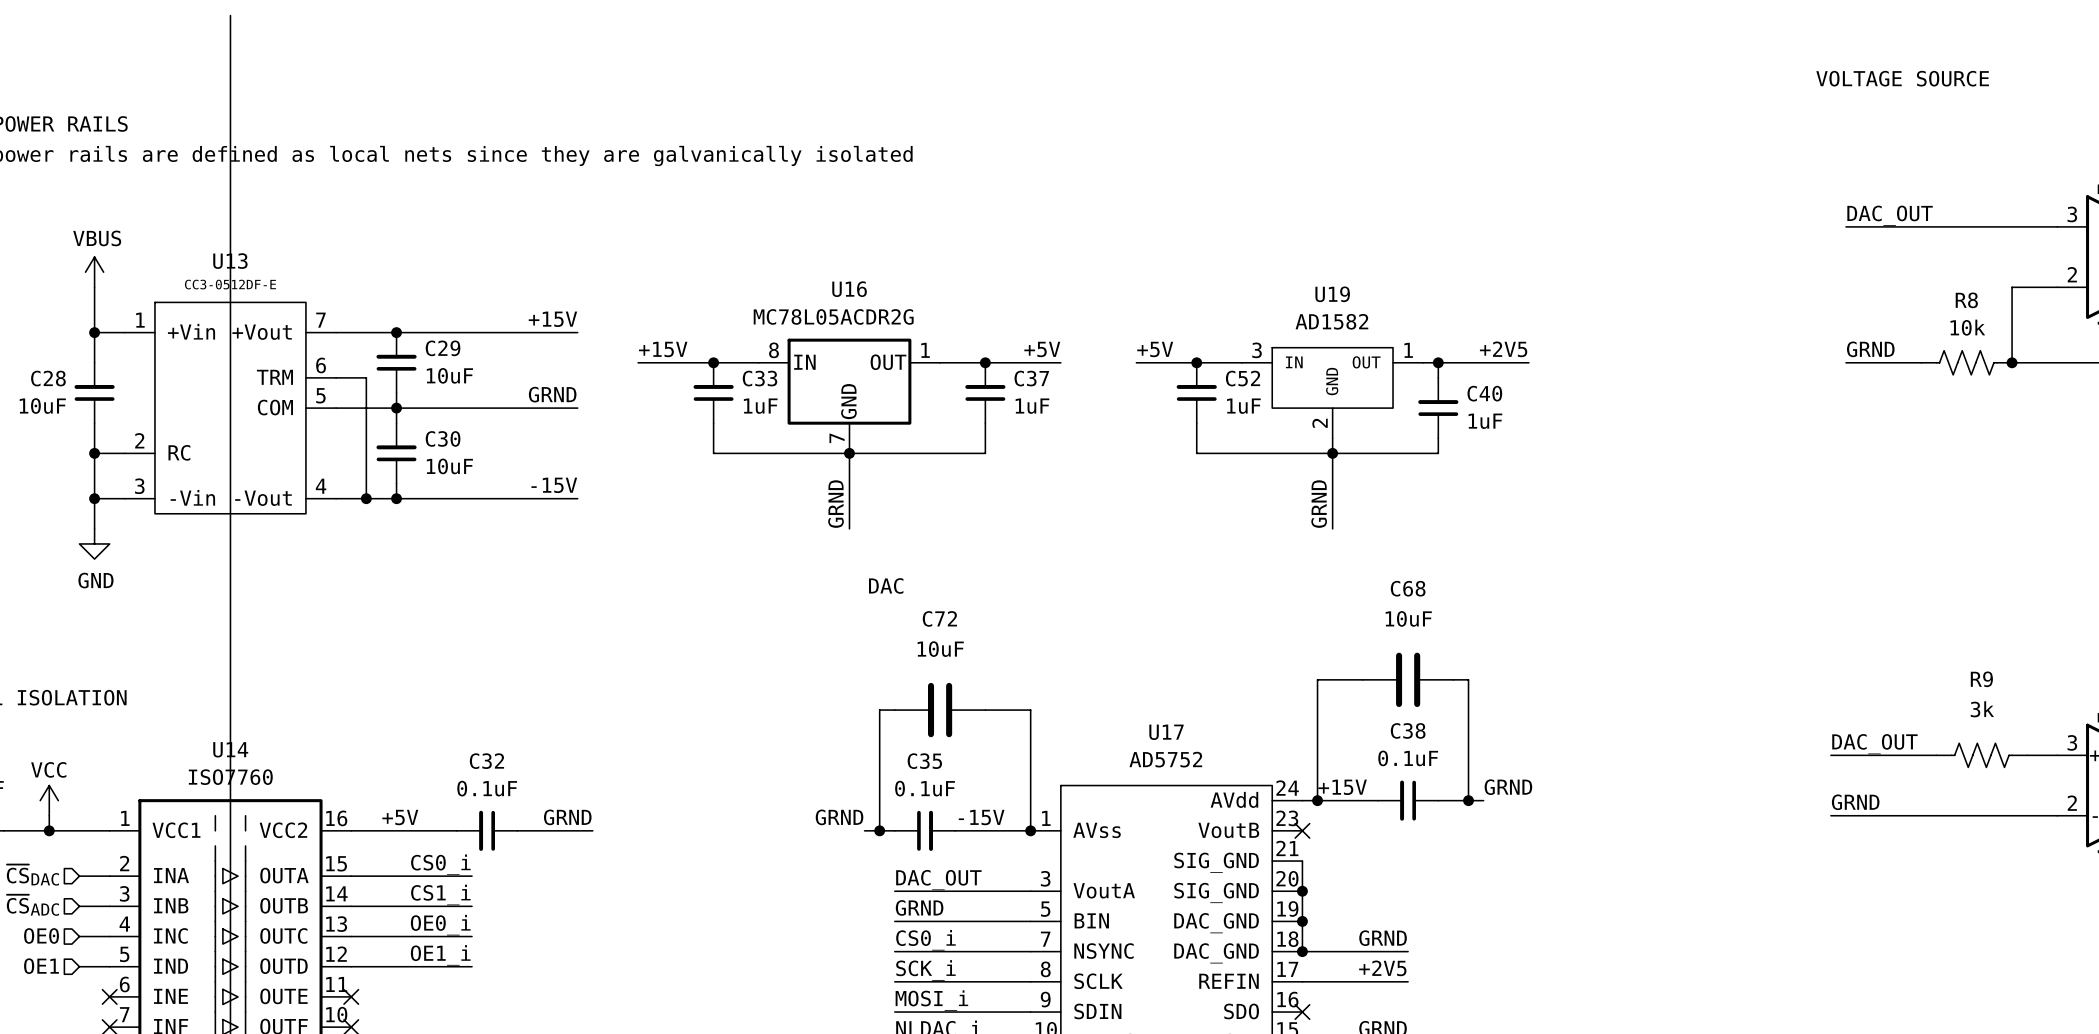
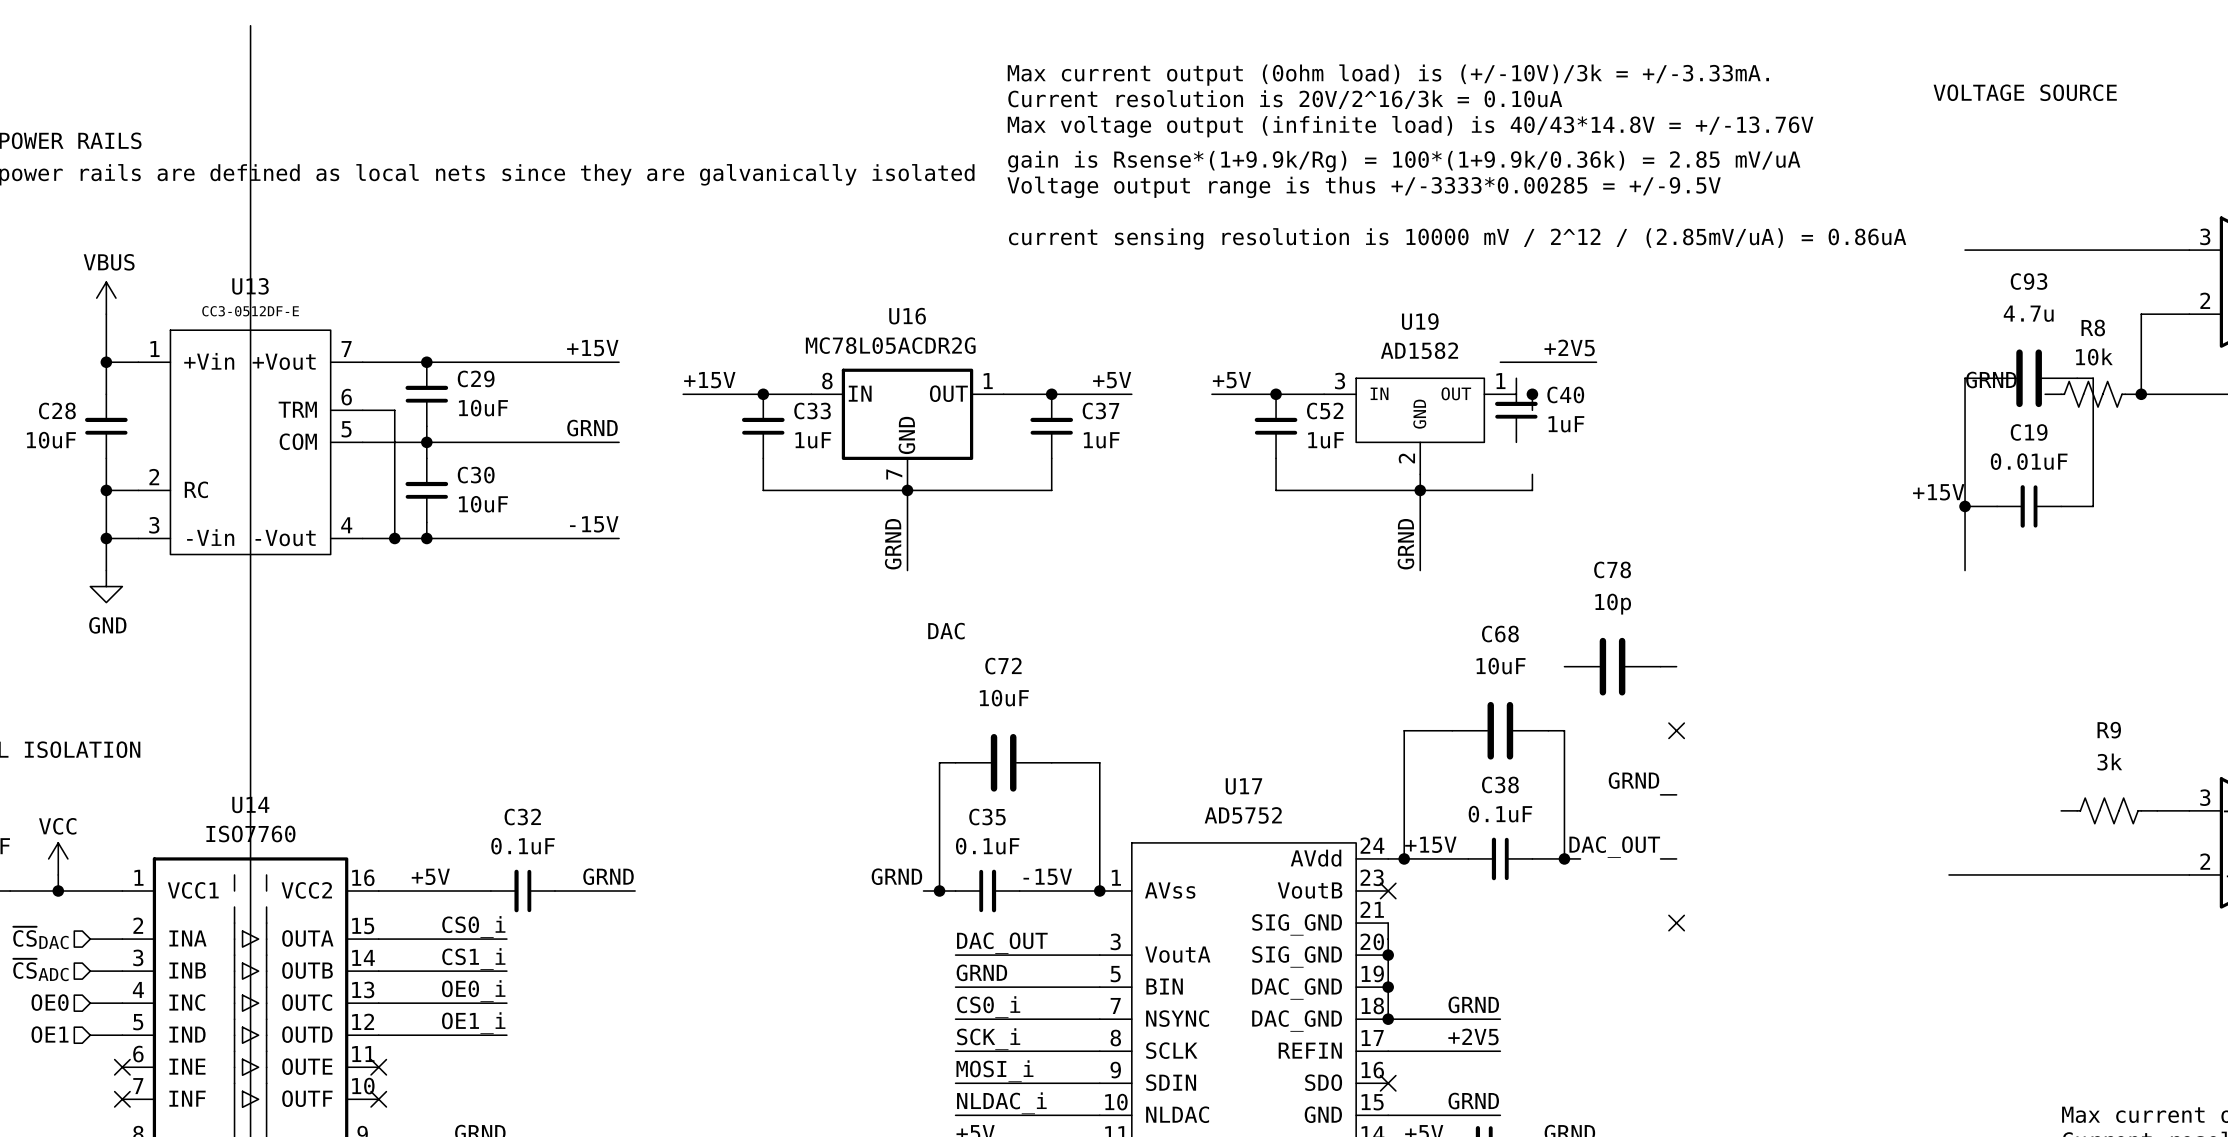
text: none -> Max current output (0ohm load) is (+/-10V)/3k = +/-3.33mA. (1388, 75)
text: none -> Current resolution is 20V/2^16/3k = 0.10uA (1285, 99)
text: none -> Max voltage output (infinite load) is 40/43*14.8V = +/-13.76V (1410, 126)
text: none -> gain is Rsense*(1+9.9k/Rg) = 100*(1+9.9k/0.36k) = 2.85 mV/uA (1404, 161)
text: none -> Voltage output range is thus +/-3333*0.00285 = +/-9.5V (1364, 187)
label: DAC_OUT (1890, 215) -> none
text: none -> current sensing resolution is 10000 mV / 2^12 / (2.85mV/uA) = 0.86uA (1457, 238)
wire: none -> (1500, 362) (1596, 362)
wire: none -> (1981, 378) (1965, 378) (1965, 570)
C93: none -> 4.7u (2029, 378)
wire: none -> (2077, 378) (2093, 378) (2093, 506) (2061, 506)
label position: +2V5 (1503, 349) -> +2V5 (1569, 347)
wire: (1423, 362) (1528, 362) -> none
wire: (1845, 362) (1921, 362) -> none
C40 position: (1438, 408) -> (1516, 410)
label: none -> +15V (1938, 492)
wire: none -> (1965, 506) (1997, 506)
junction: none -> (1965, 506)
C19: none -> 0.01uF (2029, 506)
C78: none -> 10p (1612, 666)
wire: none -> (1660, 666) (1676, 666)
no-connect mark: none -> (1676, 730)
wire: none -> (1660, 794) (1676, 794)
label position: DAC_OUT (1874, 744) -> DAC_OUT (1614, 847)
wire: (1830, 755) (1936, 755) -> none
label position: GRND (1508, 787) -> GRND (1633, 780)
wire: none -> (1660, 858) (1676, 858)
label: GRND (1855, 802) -> none
no-connect mark: none -> (1676, 923)

